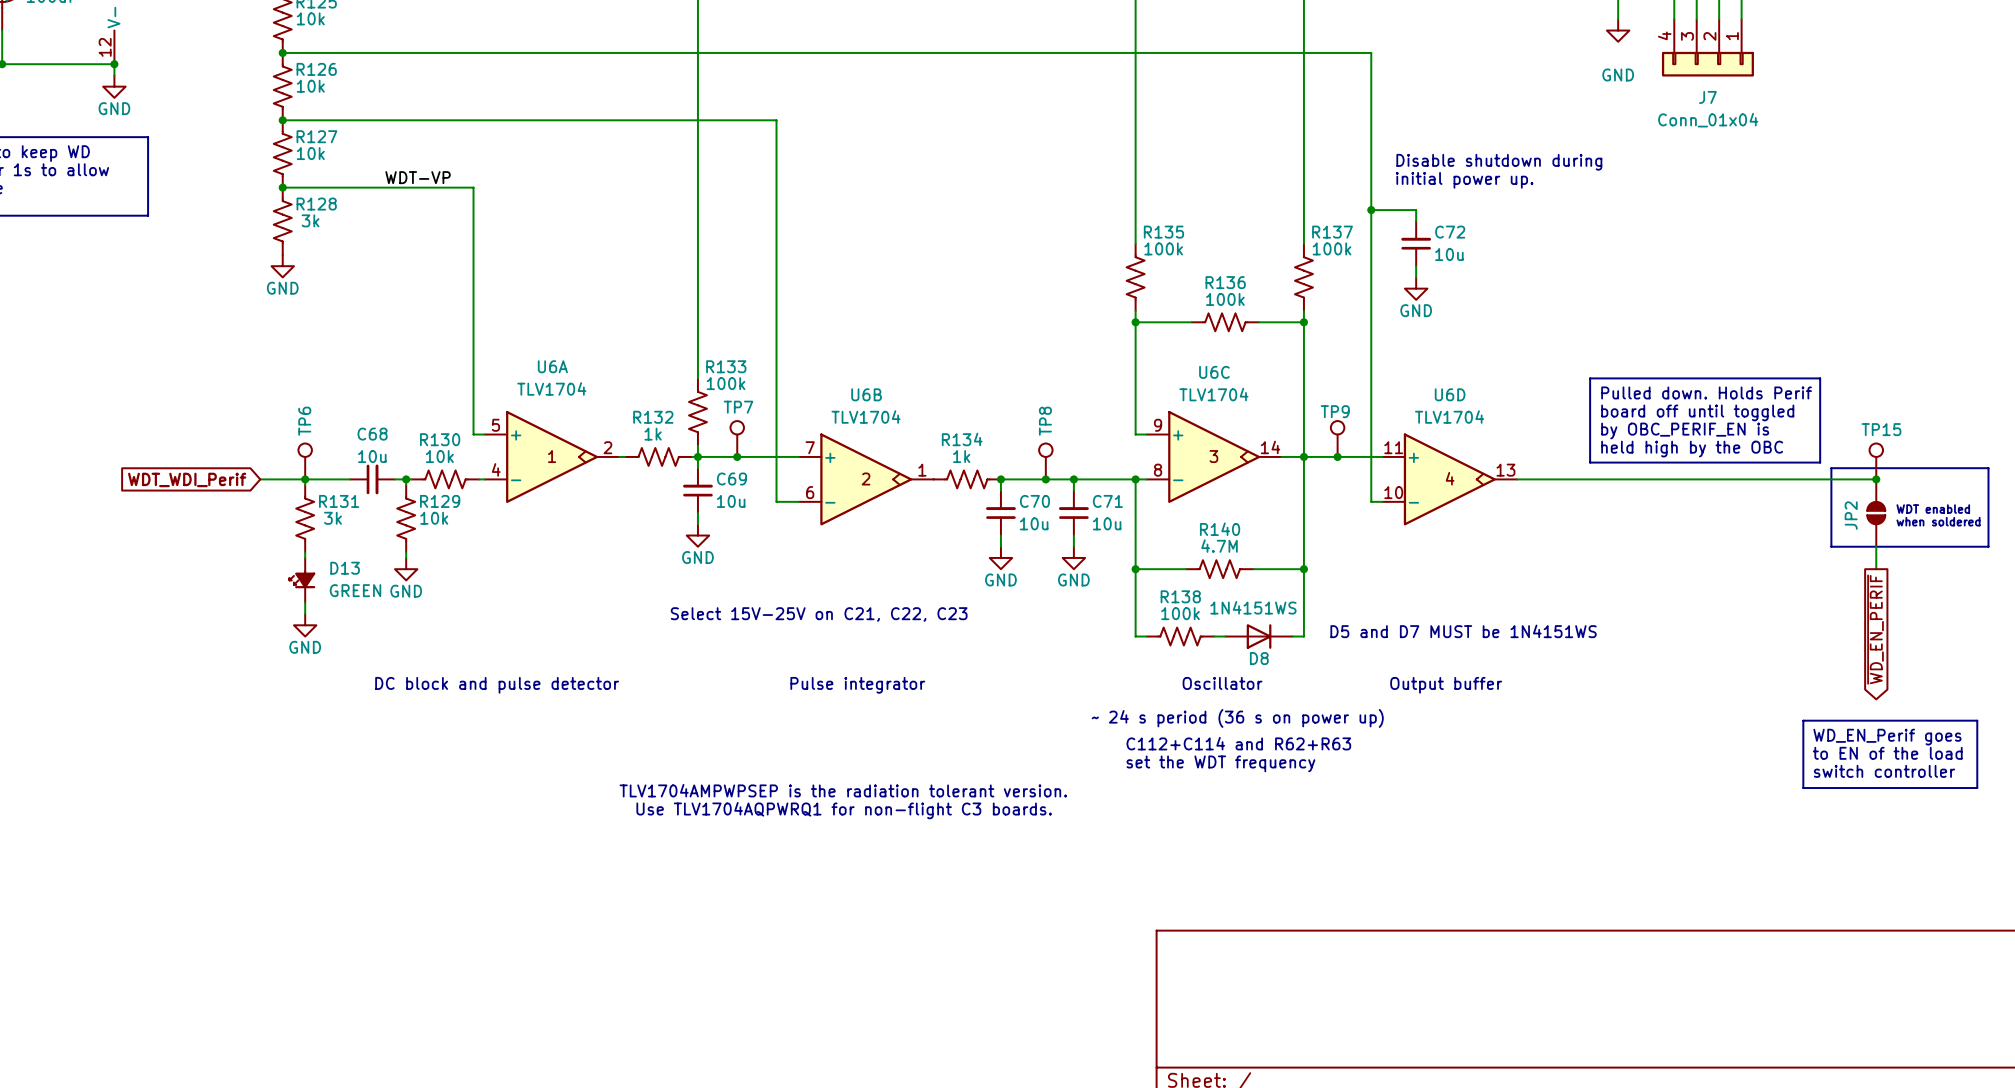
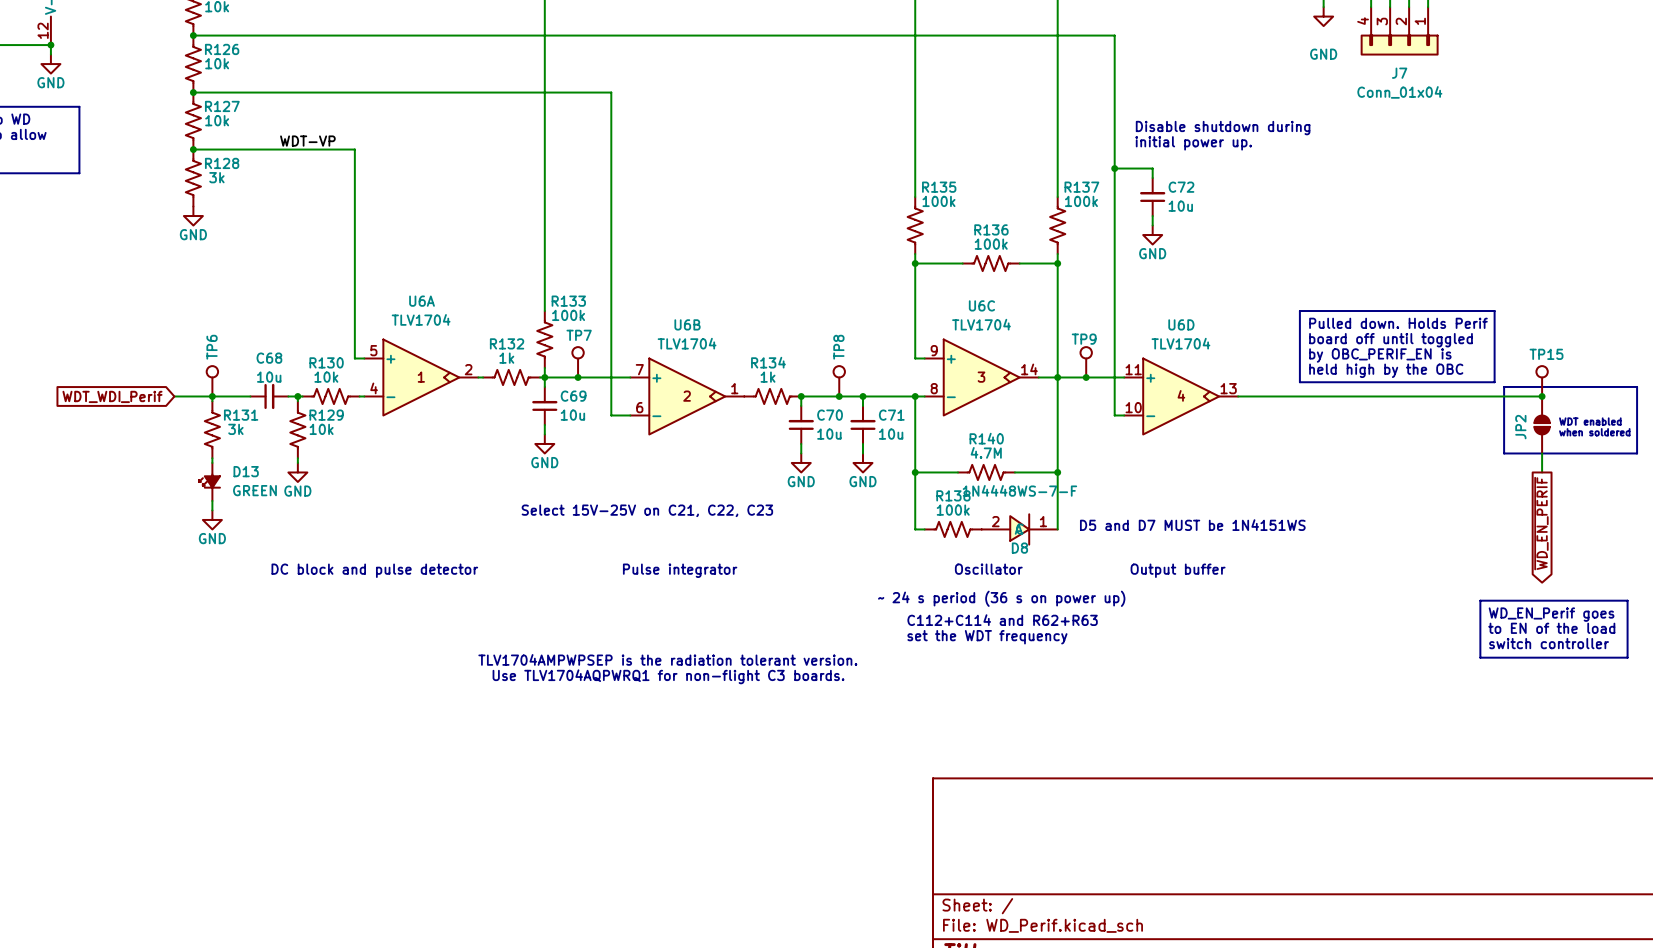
D8 value: 1N4151WS (1253, 607) -> 1N4448WS-7-F (1019, 490)
D8 symbol: [1225, 624, 1293, 649] -> [981, 514, 1058, 545]

